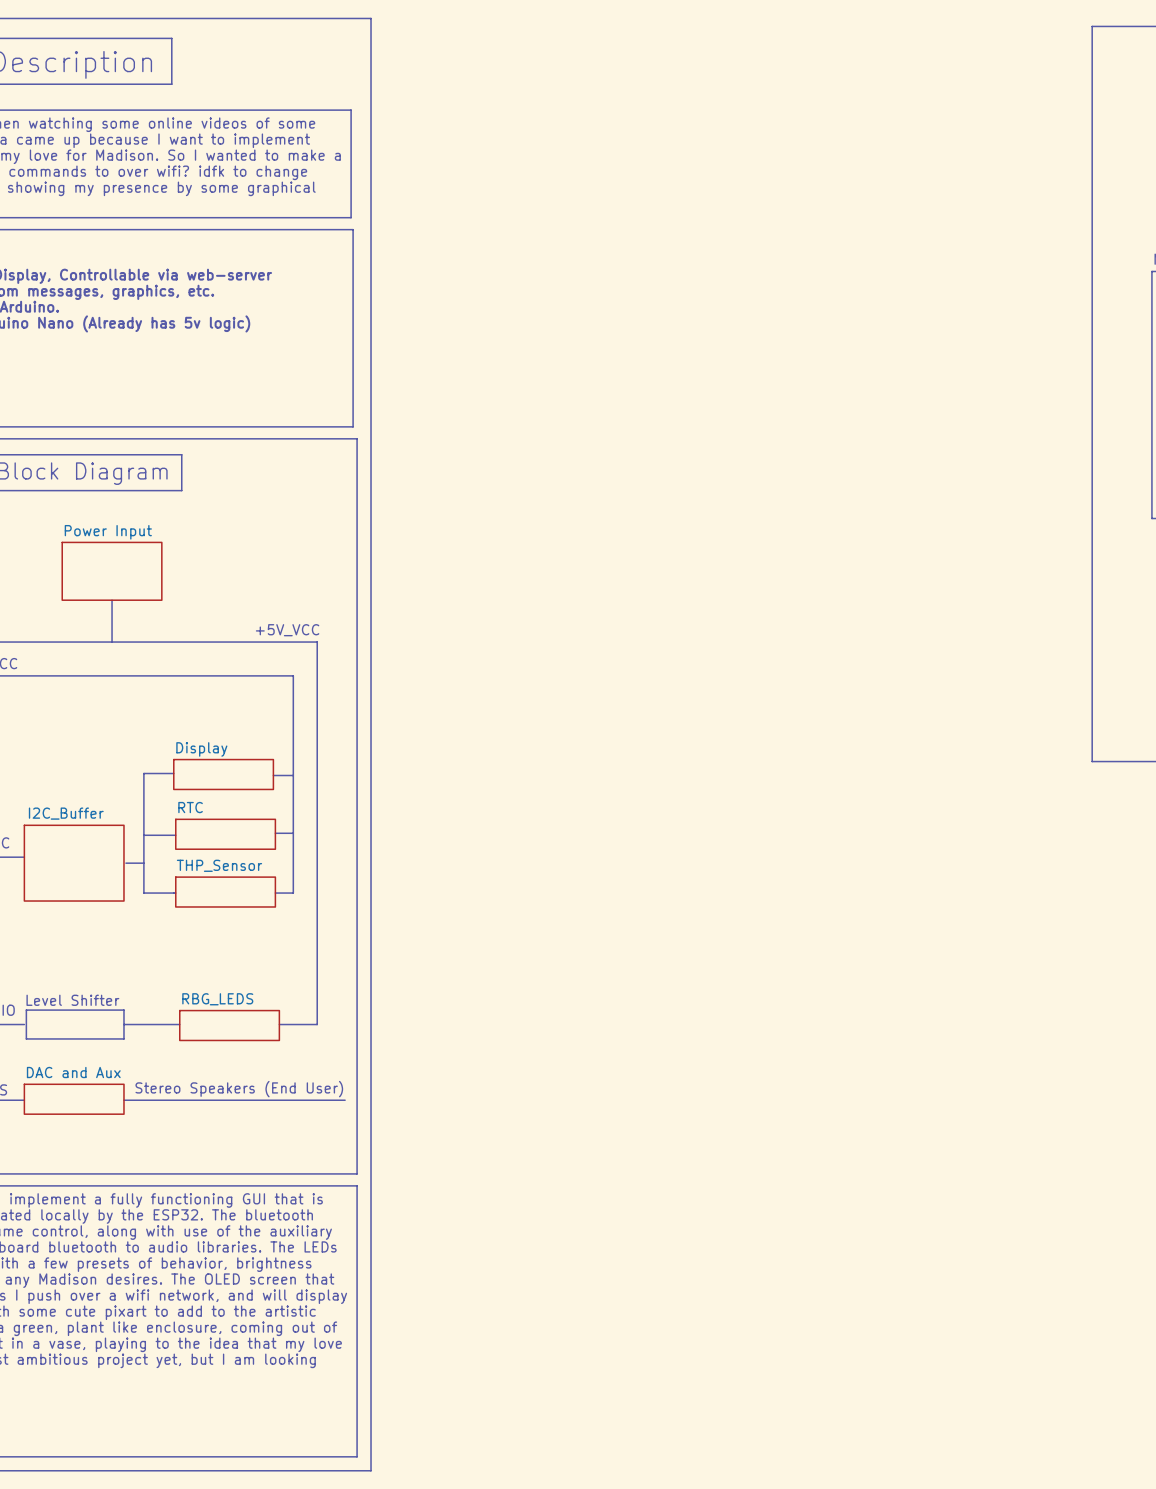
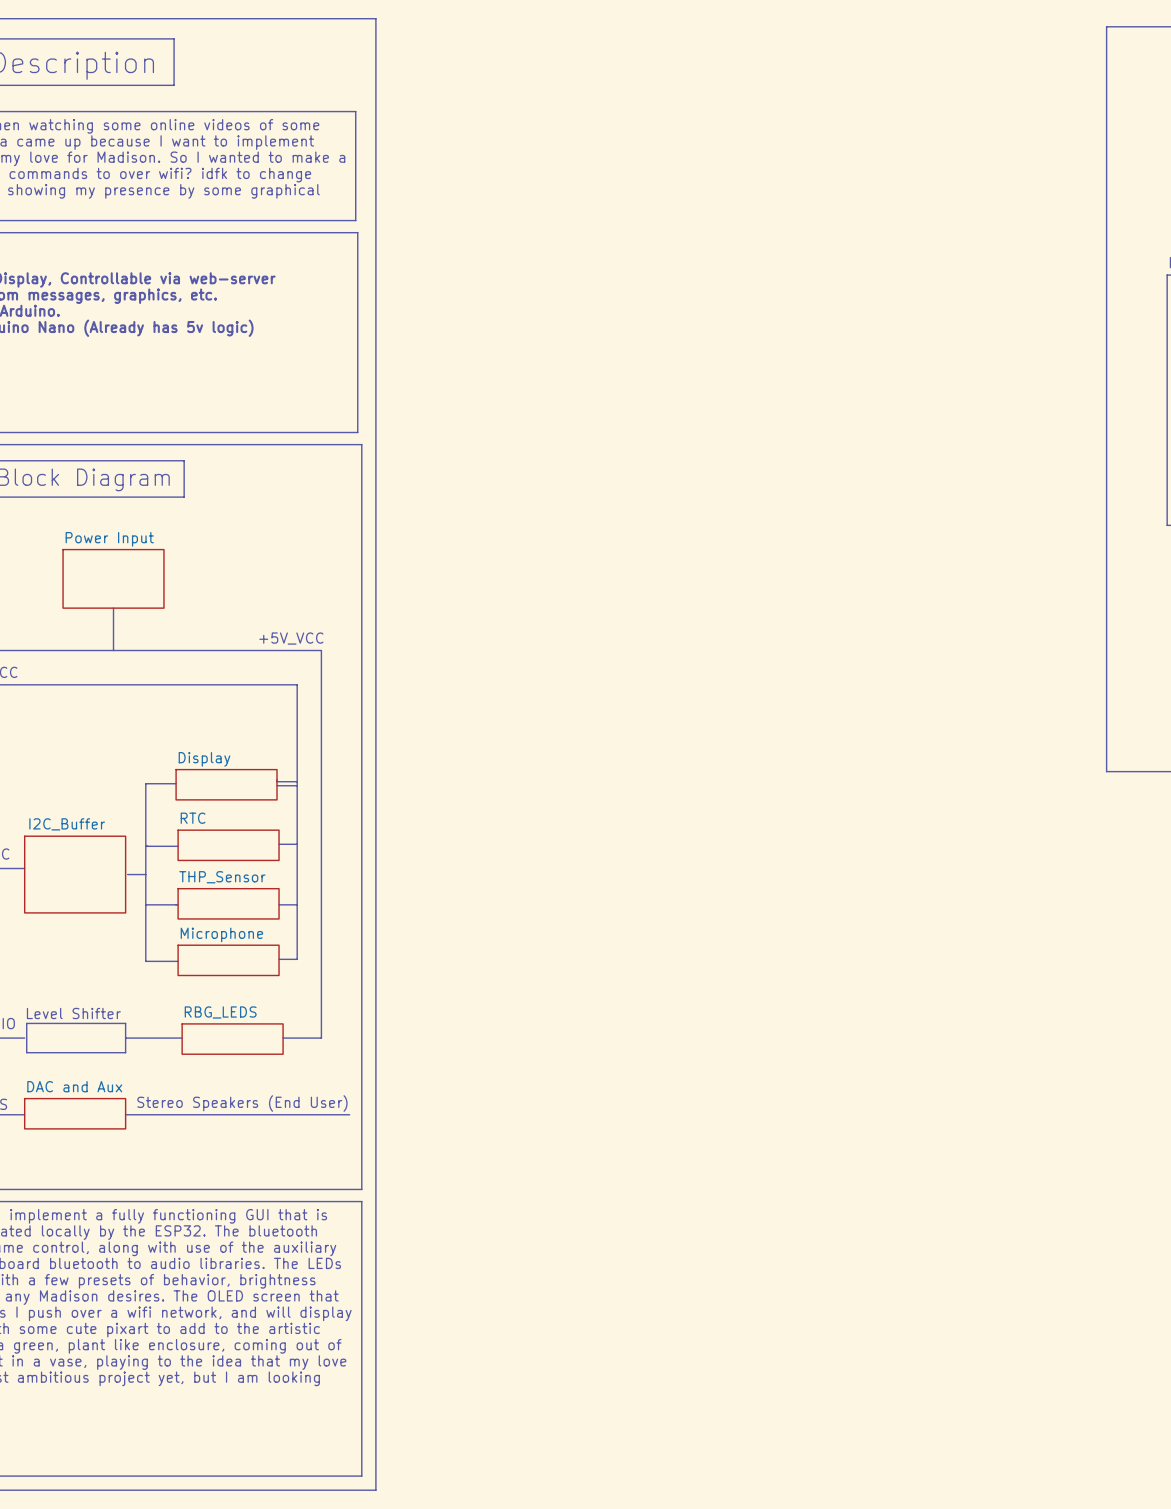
line: none -> (277, 779) (277, 781) (297, 781)
line: none -> (145, 904) (145, 961) (178, 961)
line: none -> (297, 904) (297, 959) (279, 959)
sheet Microphone: none -> (228, 960)

